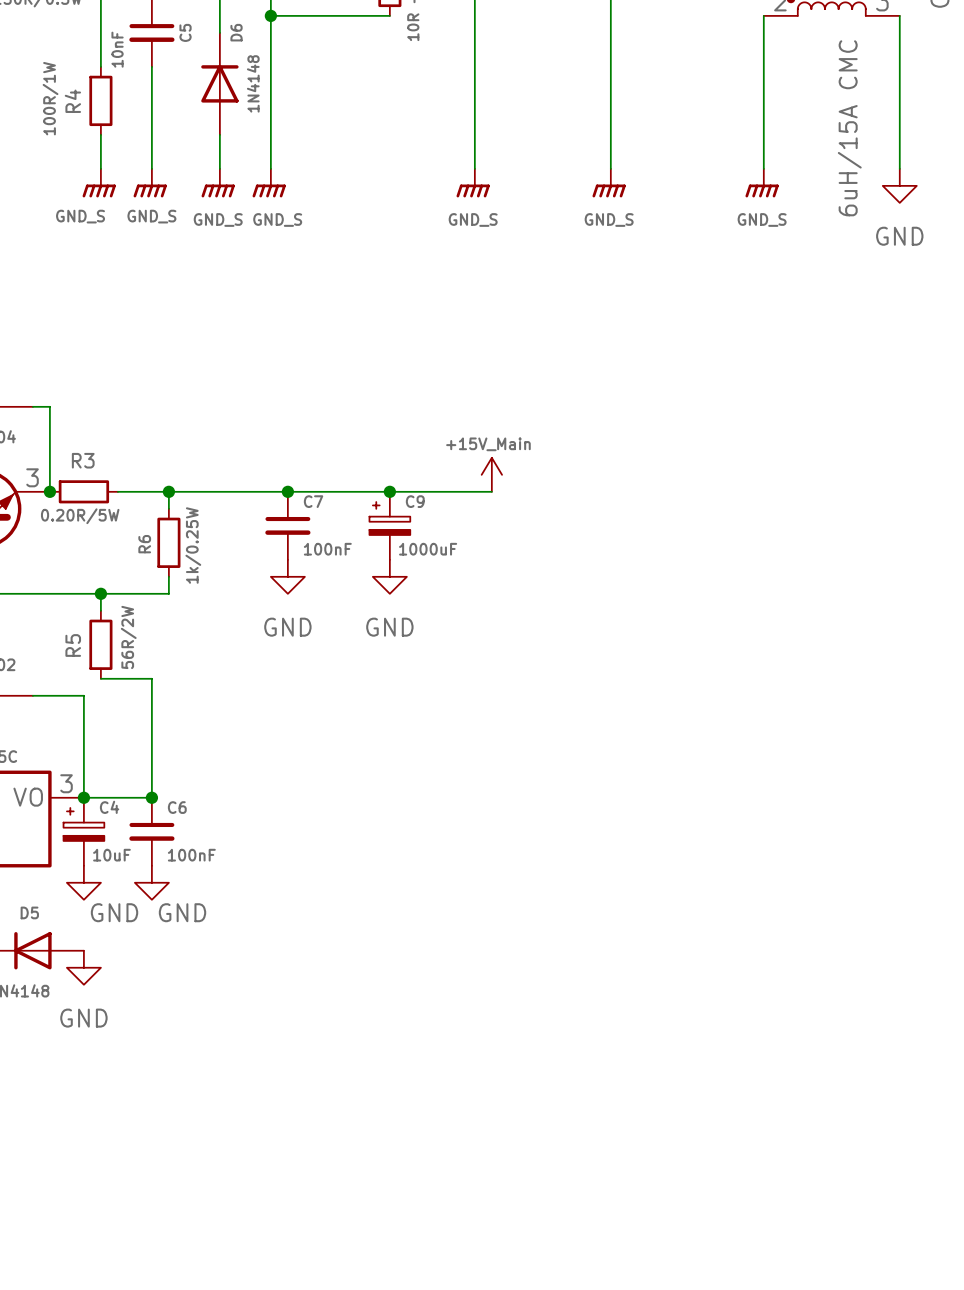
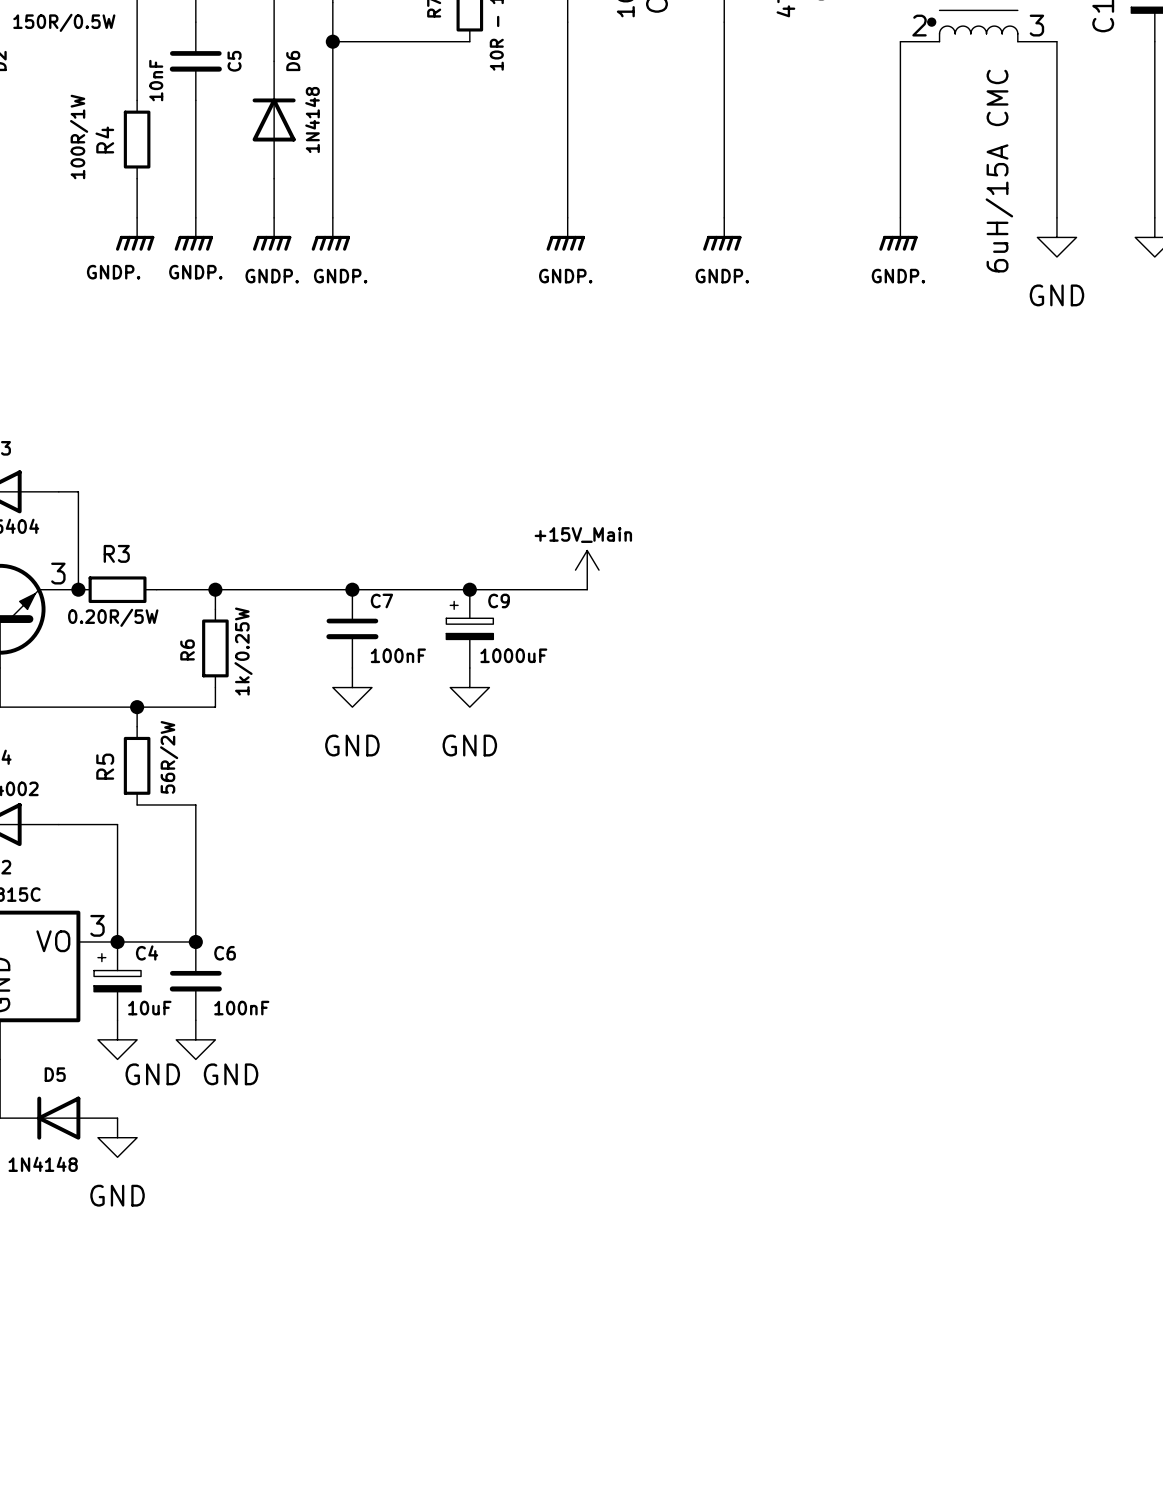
power symbol: GND_S (99, 183) -> GNDP. (135, 234)
power symbol: GND_S (150, 183) -> GNDP. (193, 234)
power symbol: GND_S (218, 183) -> GNDP. (272, 234)
power symbol: GND_S (269, 183) -> GNDP. (330, 234)
power symbol: GND_S (473, 183) -> GNDP. (565, 234)
power symbol: GND_S (609, 183) -> GNDP. (722, 234)
power symbol: GND_S (762, 183) -> GNDP. (898, 234)

